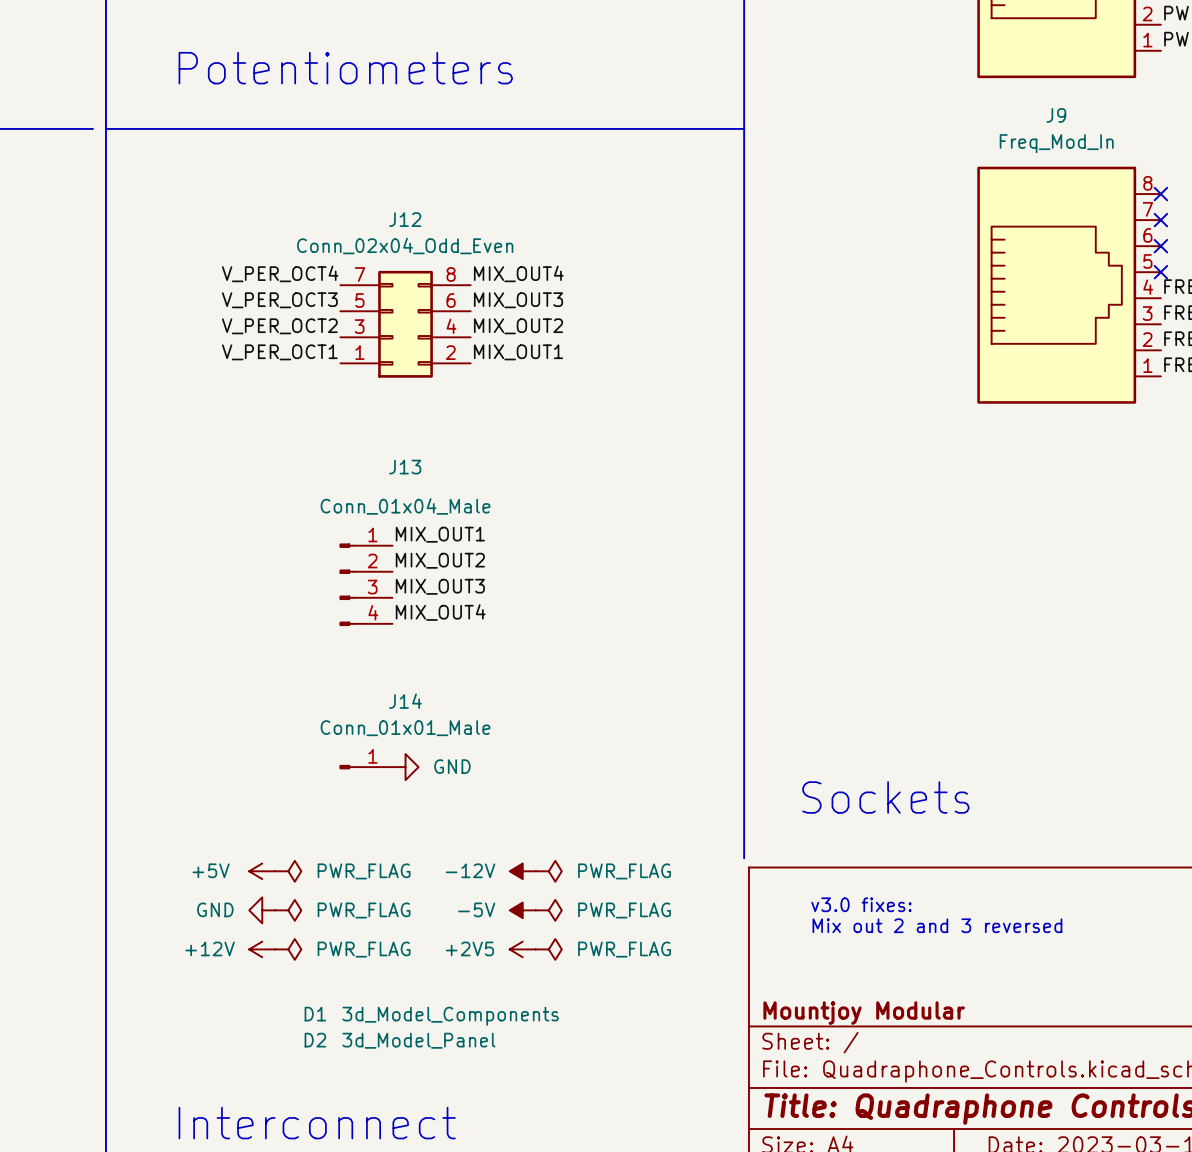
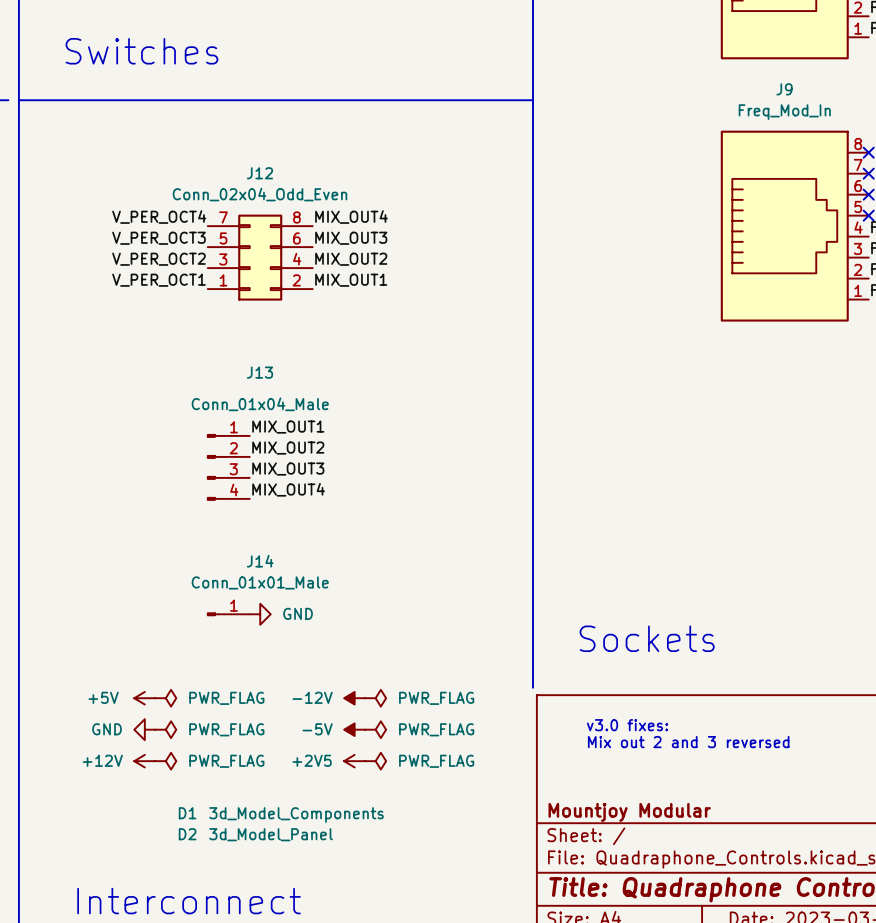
text: none -> Switches (141, 51)
text: Potentiometers (345, 68) -> none

